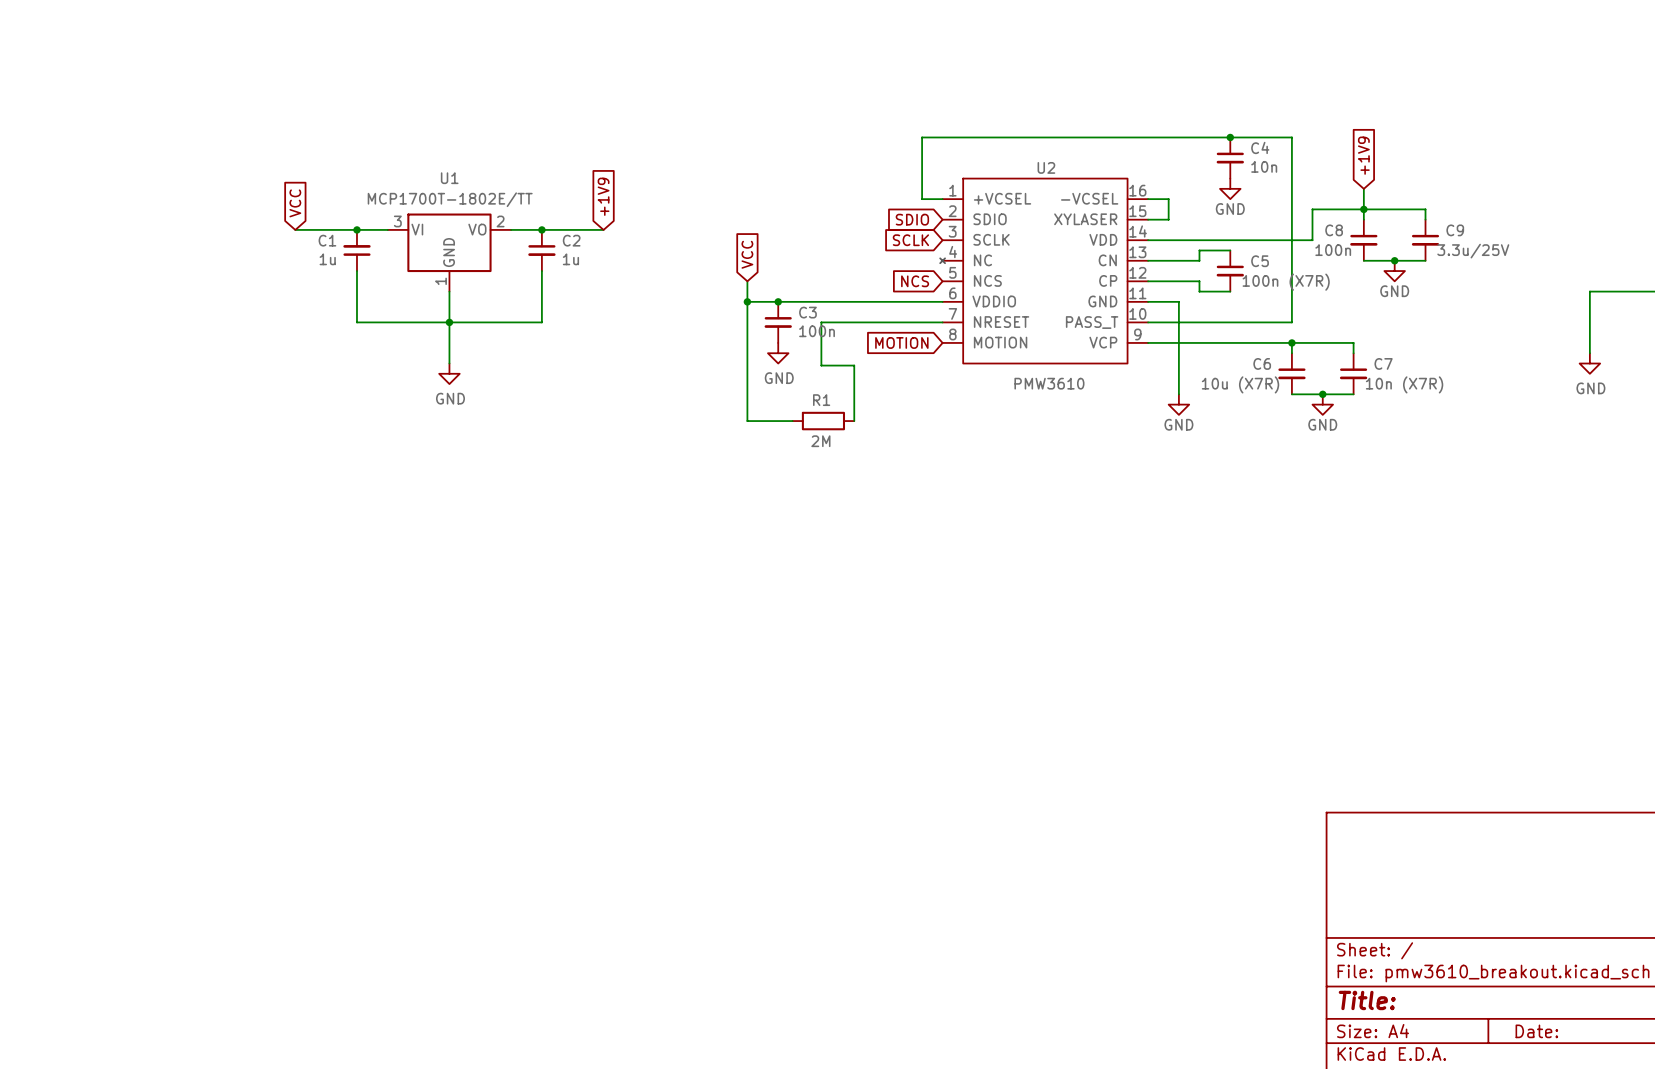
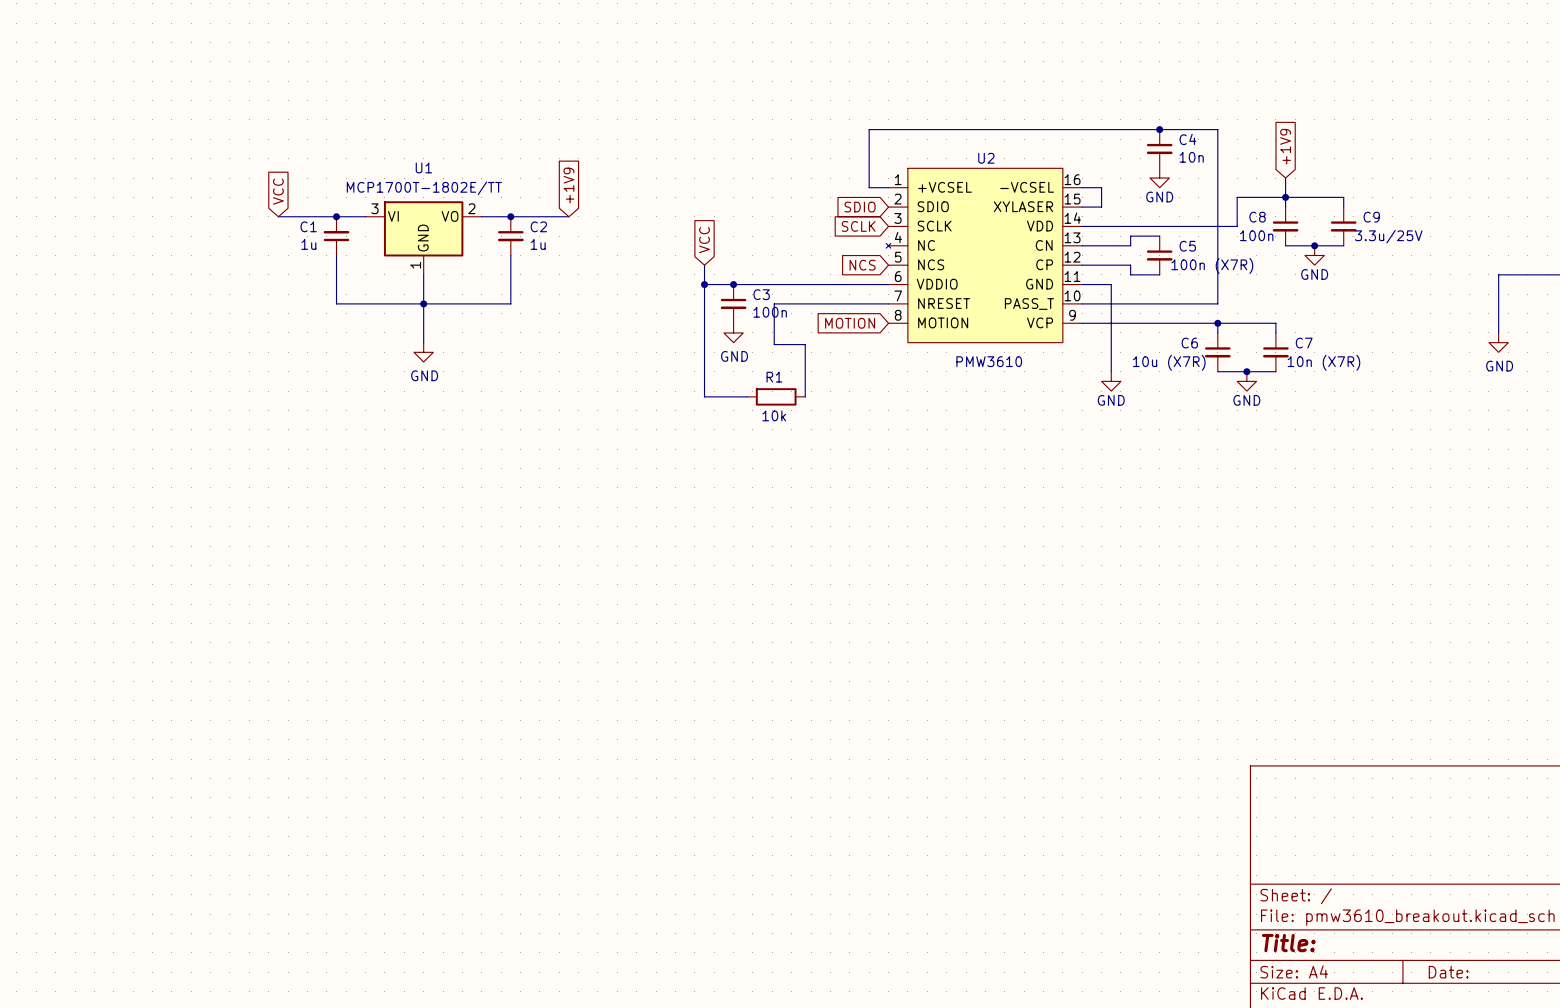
R1 value: 2M (820, 441) -> 10k (774, 415)

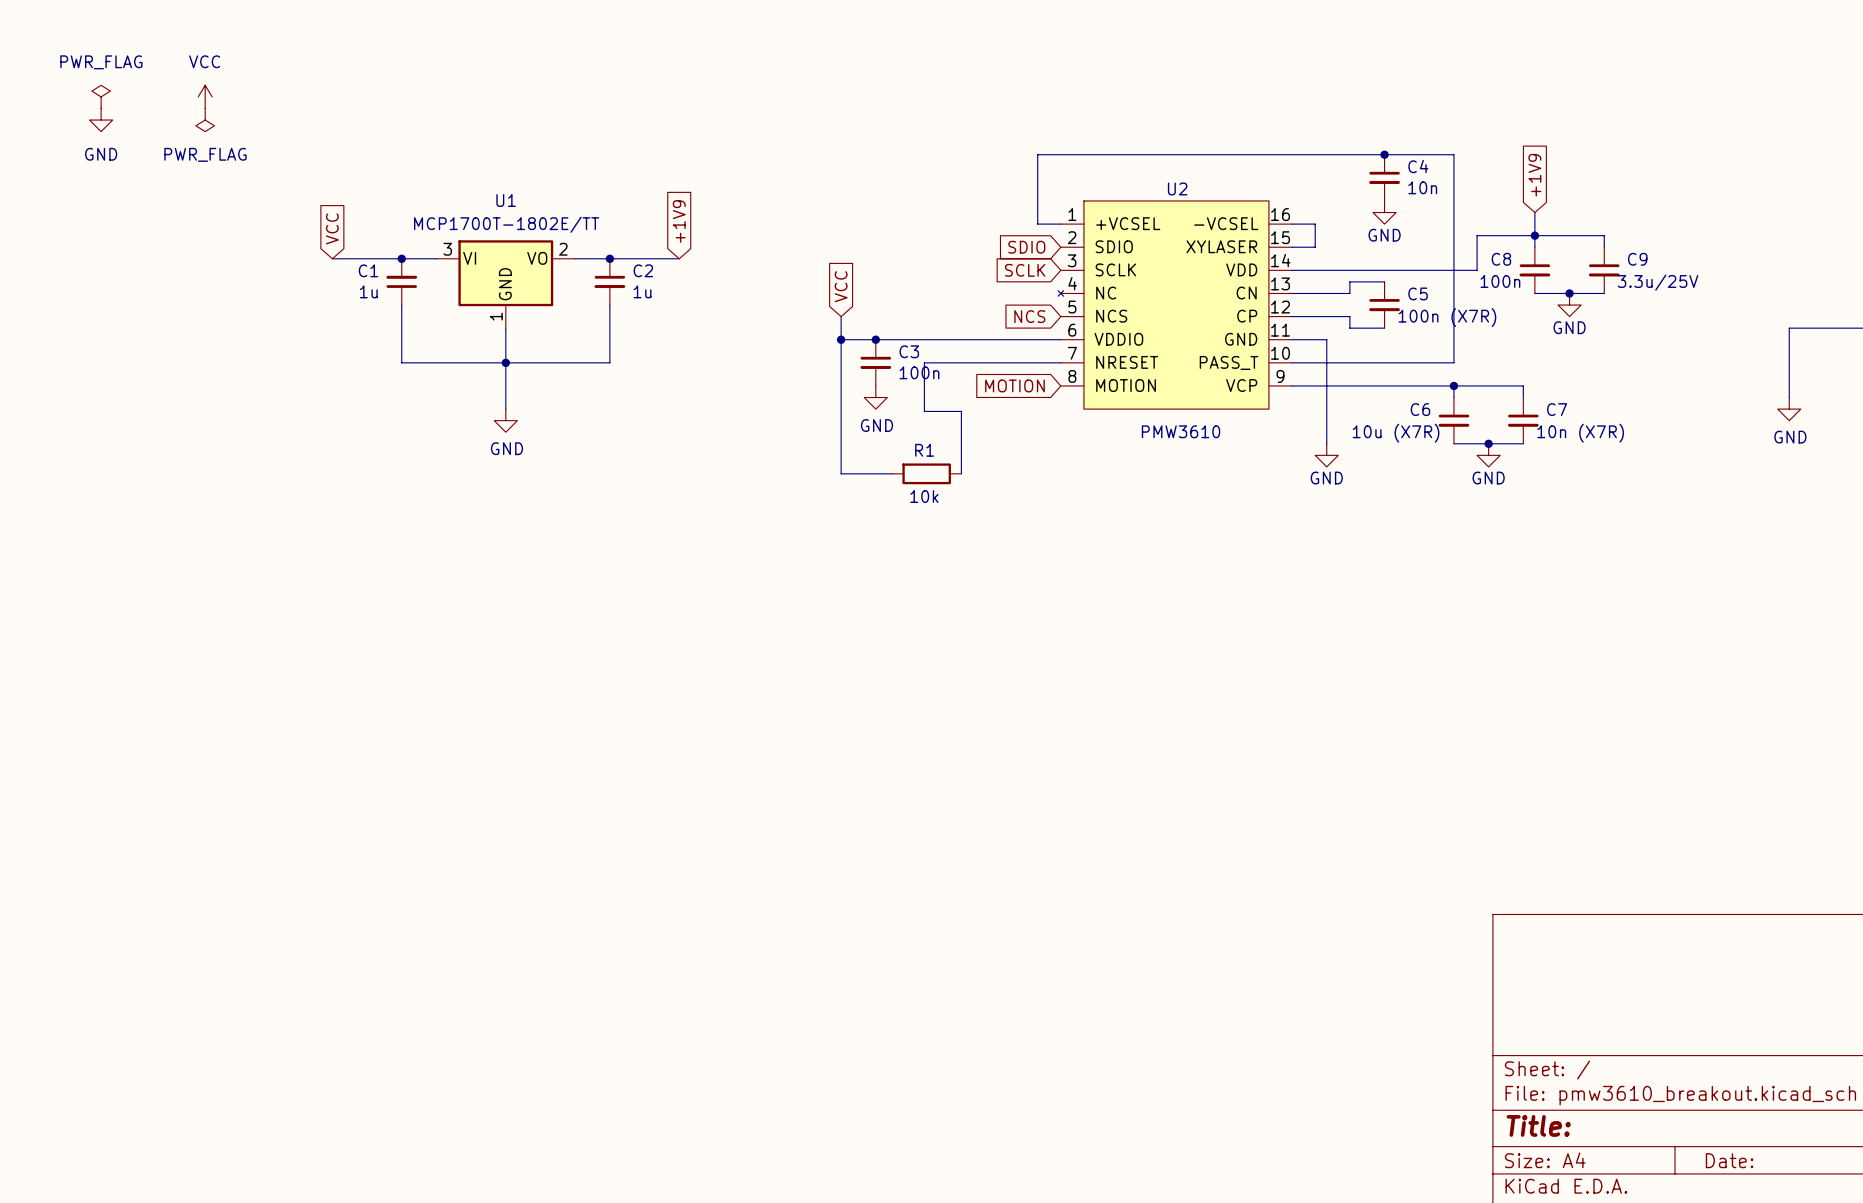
power symbol: none -> PWR_FLAG (101, 96)
power symbol: none -> VCC (205, 96)
power symbol: none -> GND (101, 120)
power symbol: none -> PWR_FLAG (205, 120)

